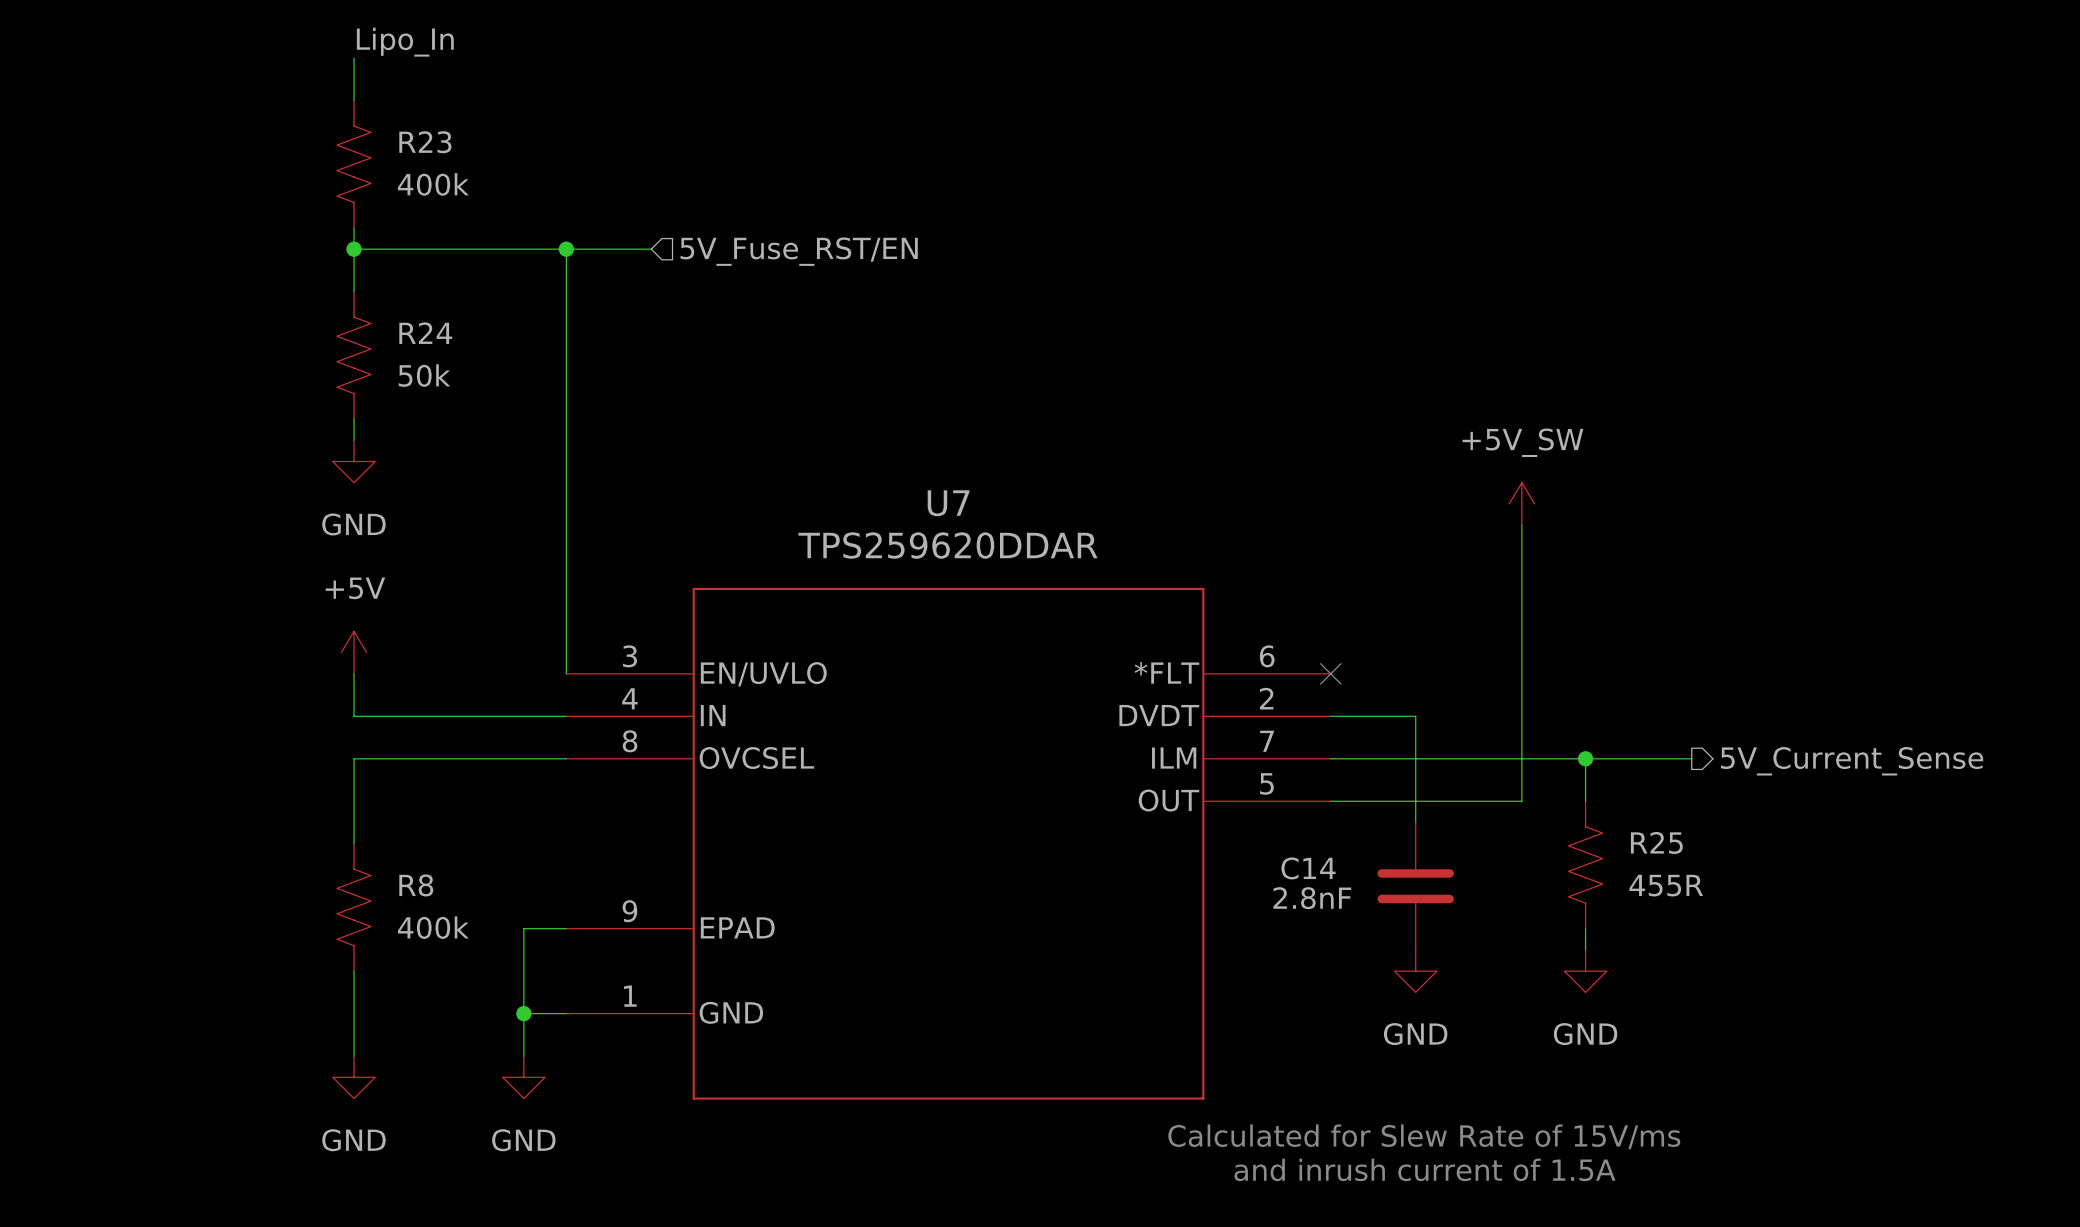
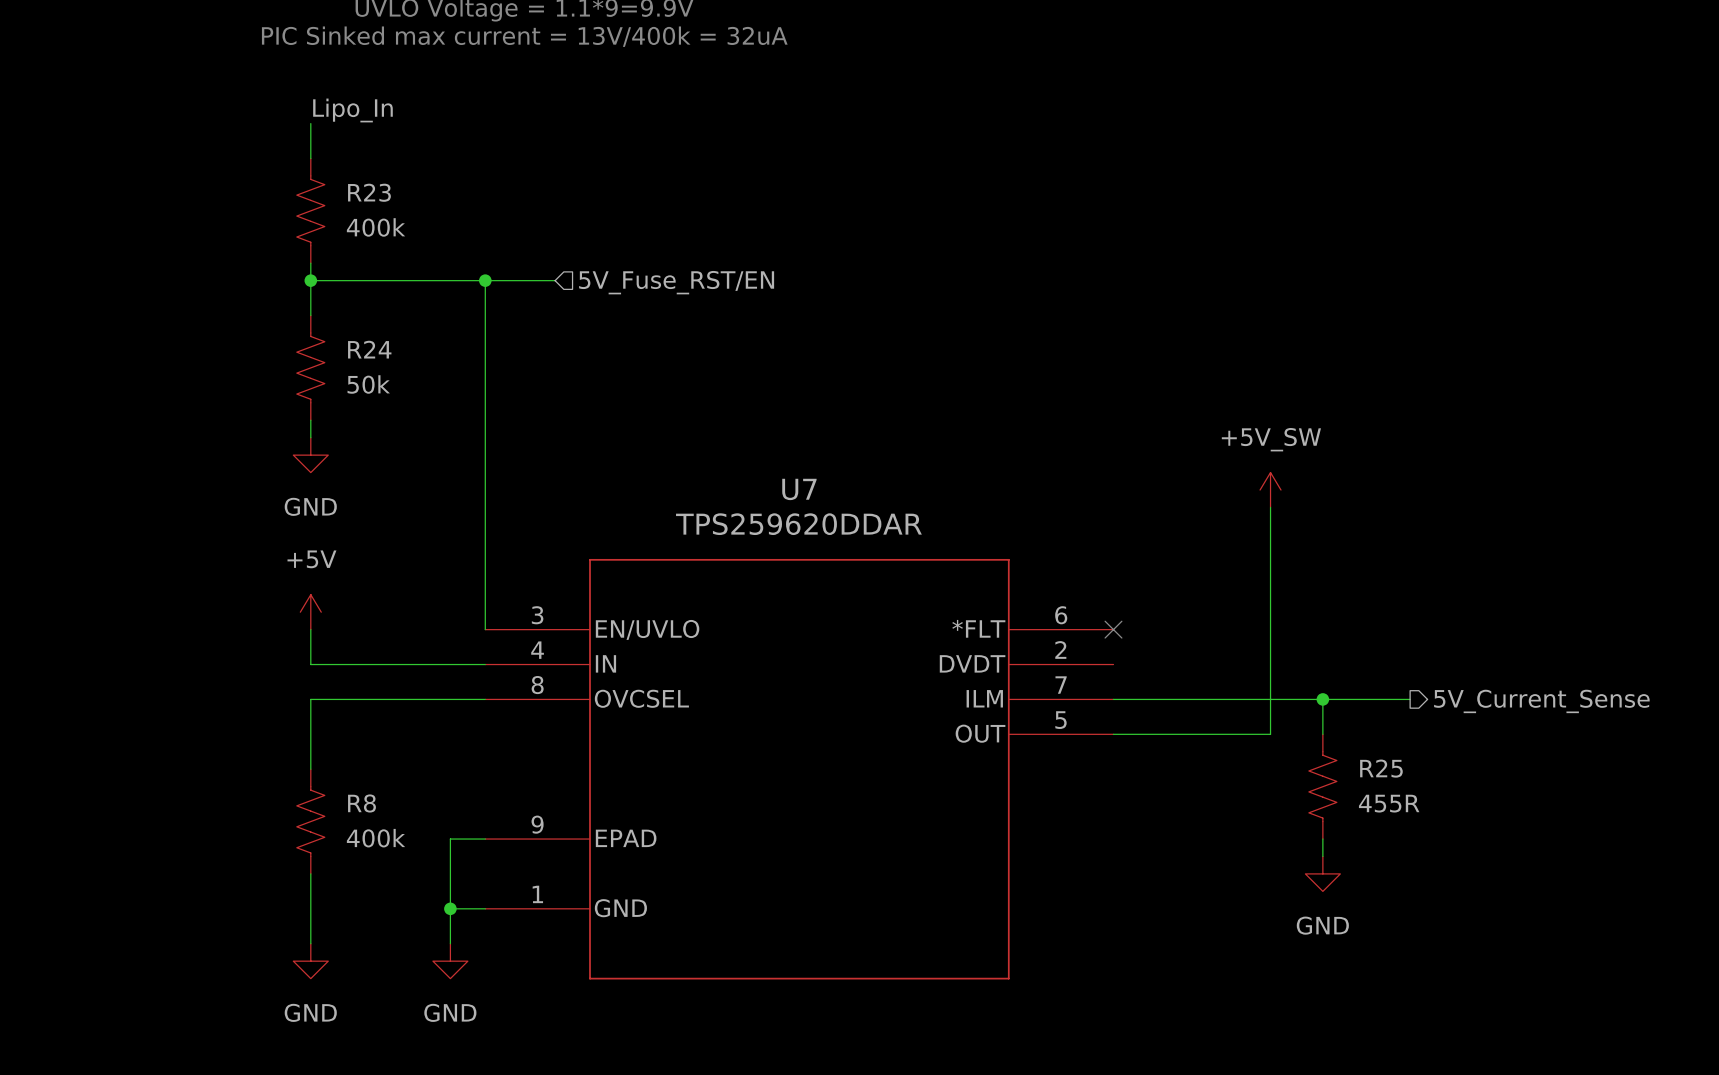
wire: (1330, 716) (1415, 716) (1415, 822) -> none
C14: 2.8nF (1415, 886) -> none
power symbol: GND (1415, 971) -> none
text: Calculated for Slew Rate of 15V/ms (1424, 1136) -> none
text: and inrush current of 1.5A (1424, 1169) -> none

